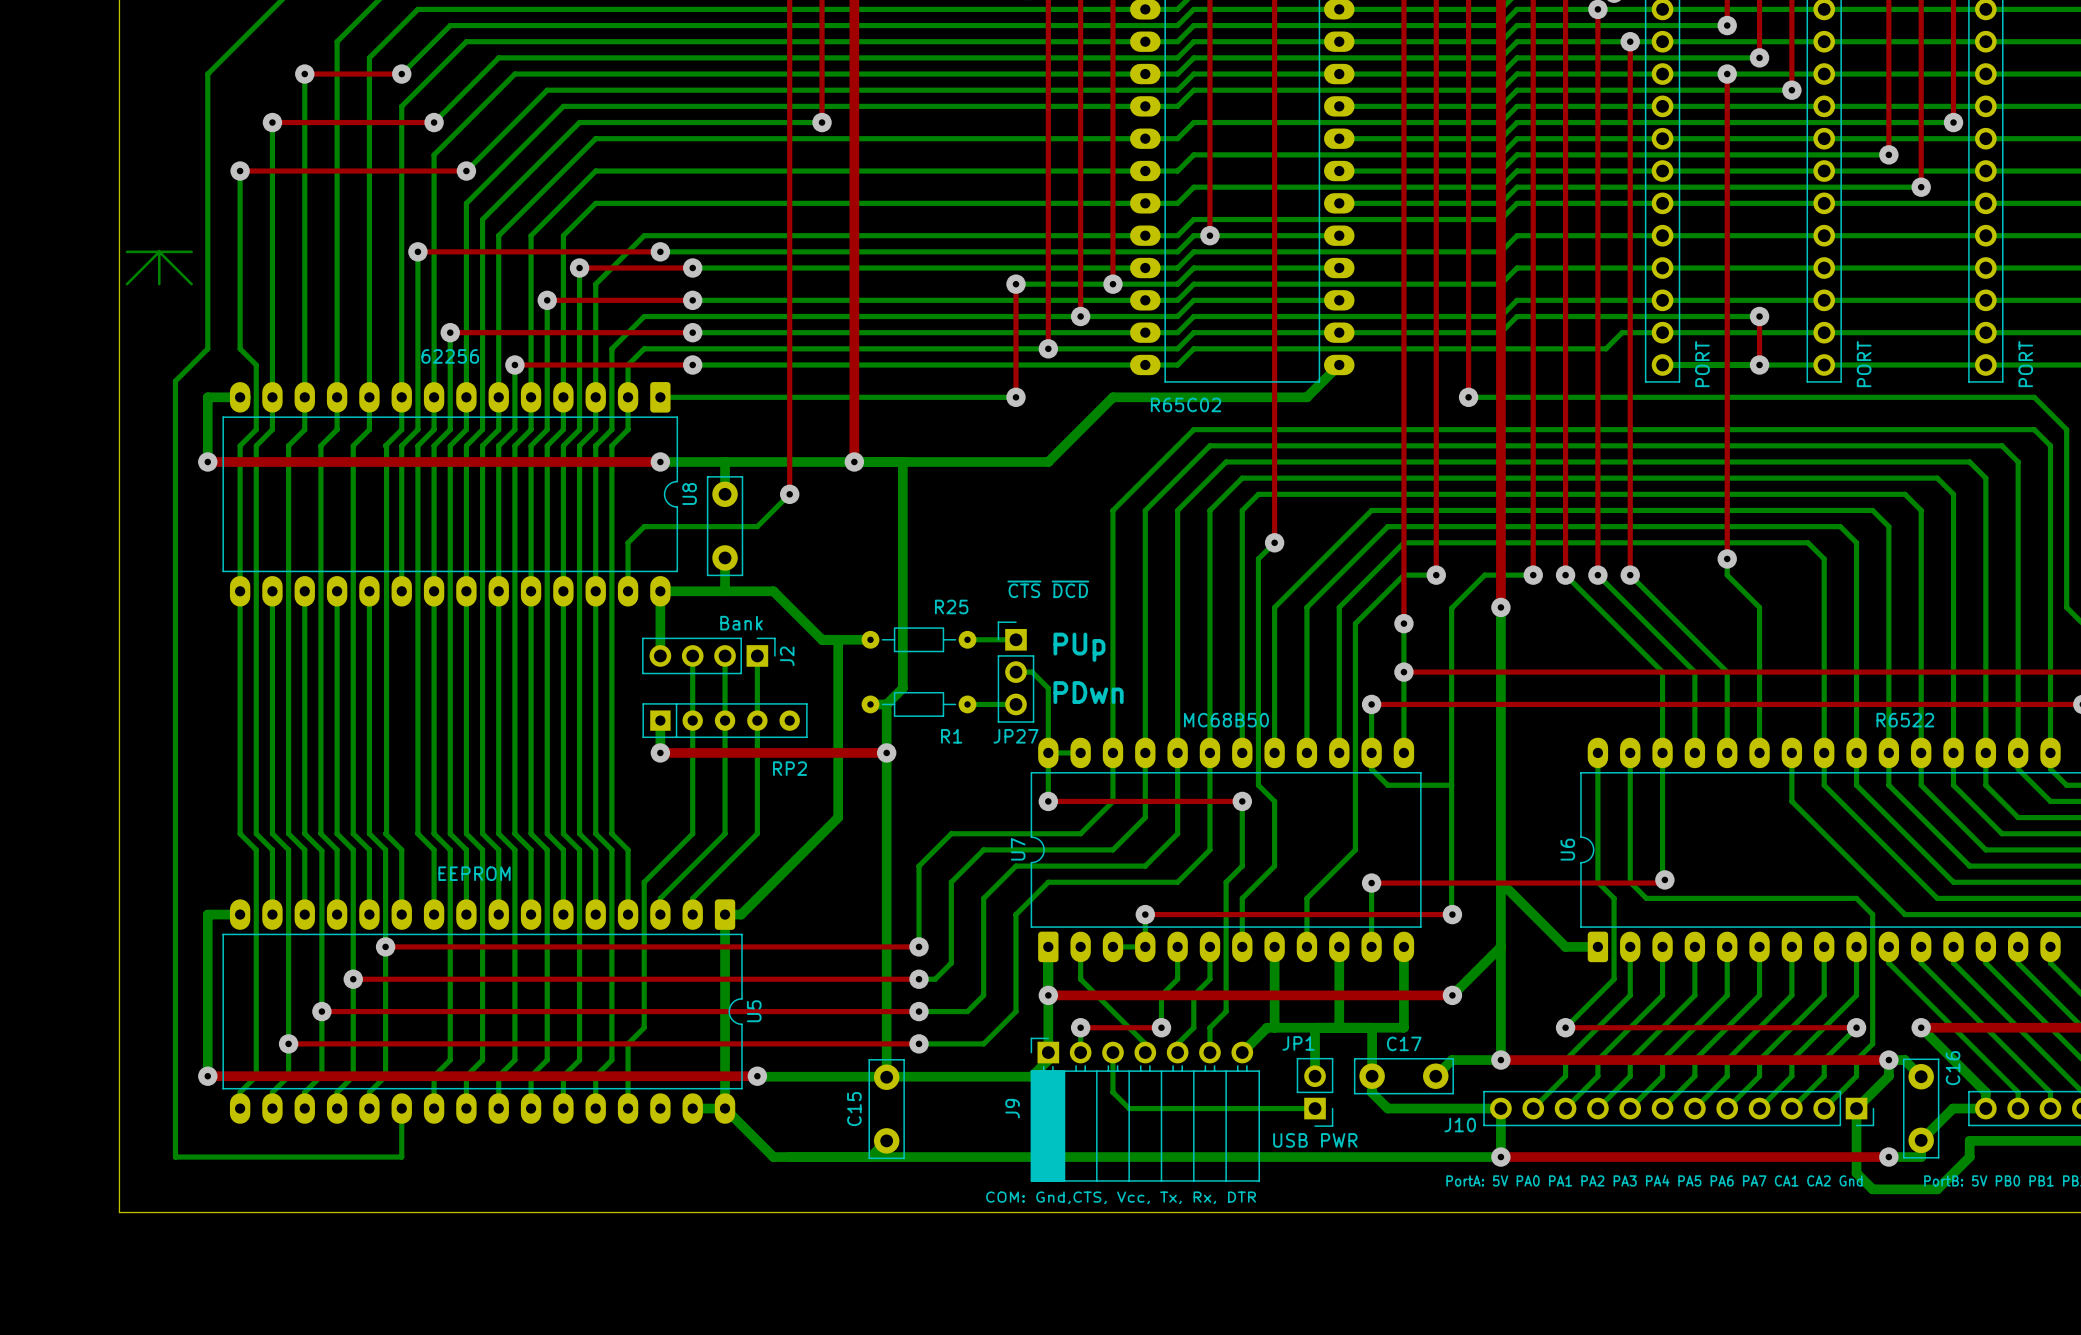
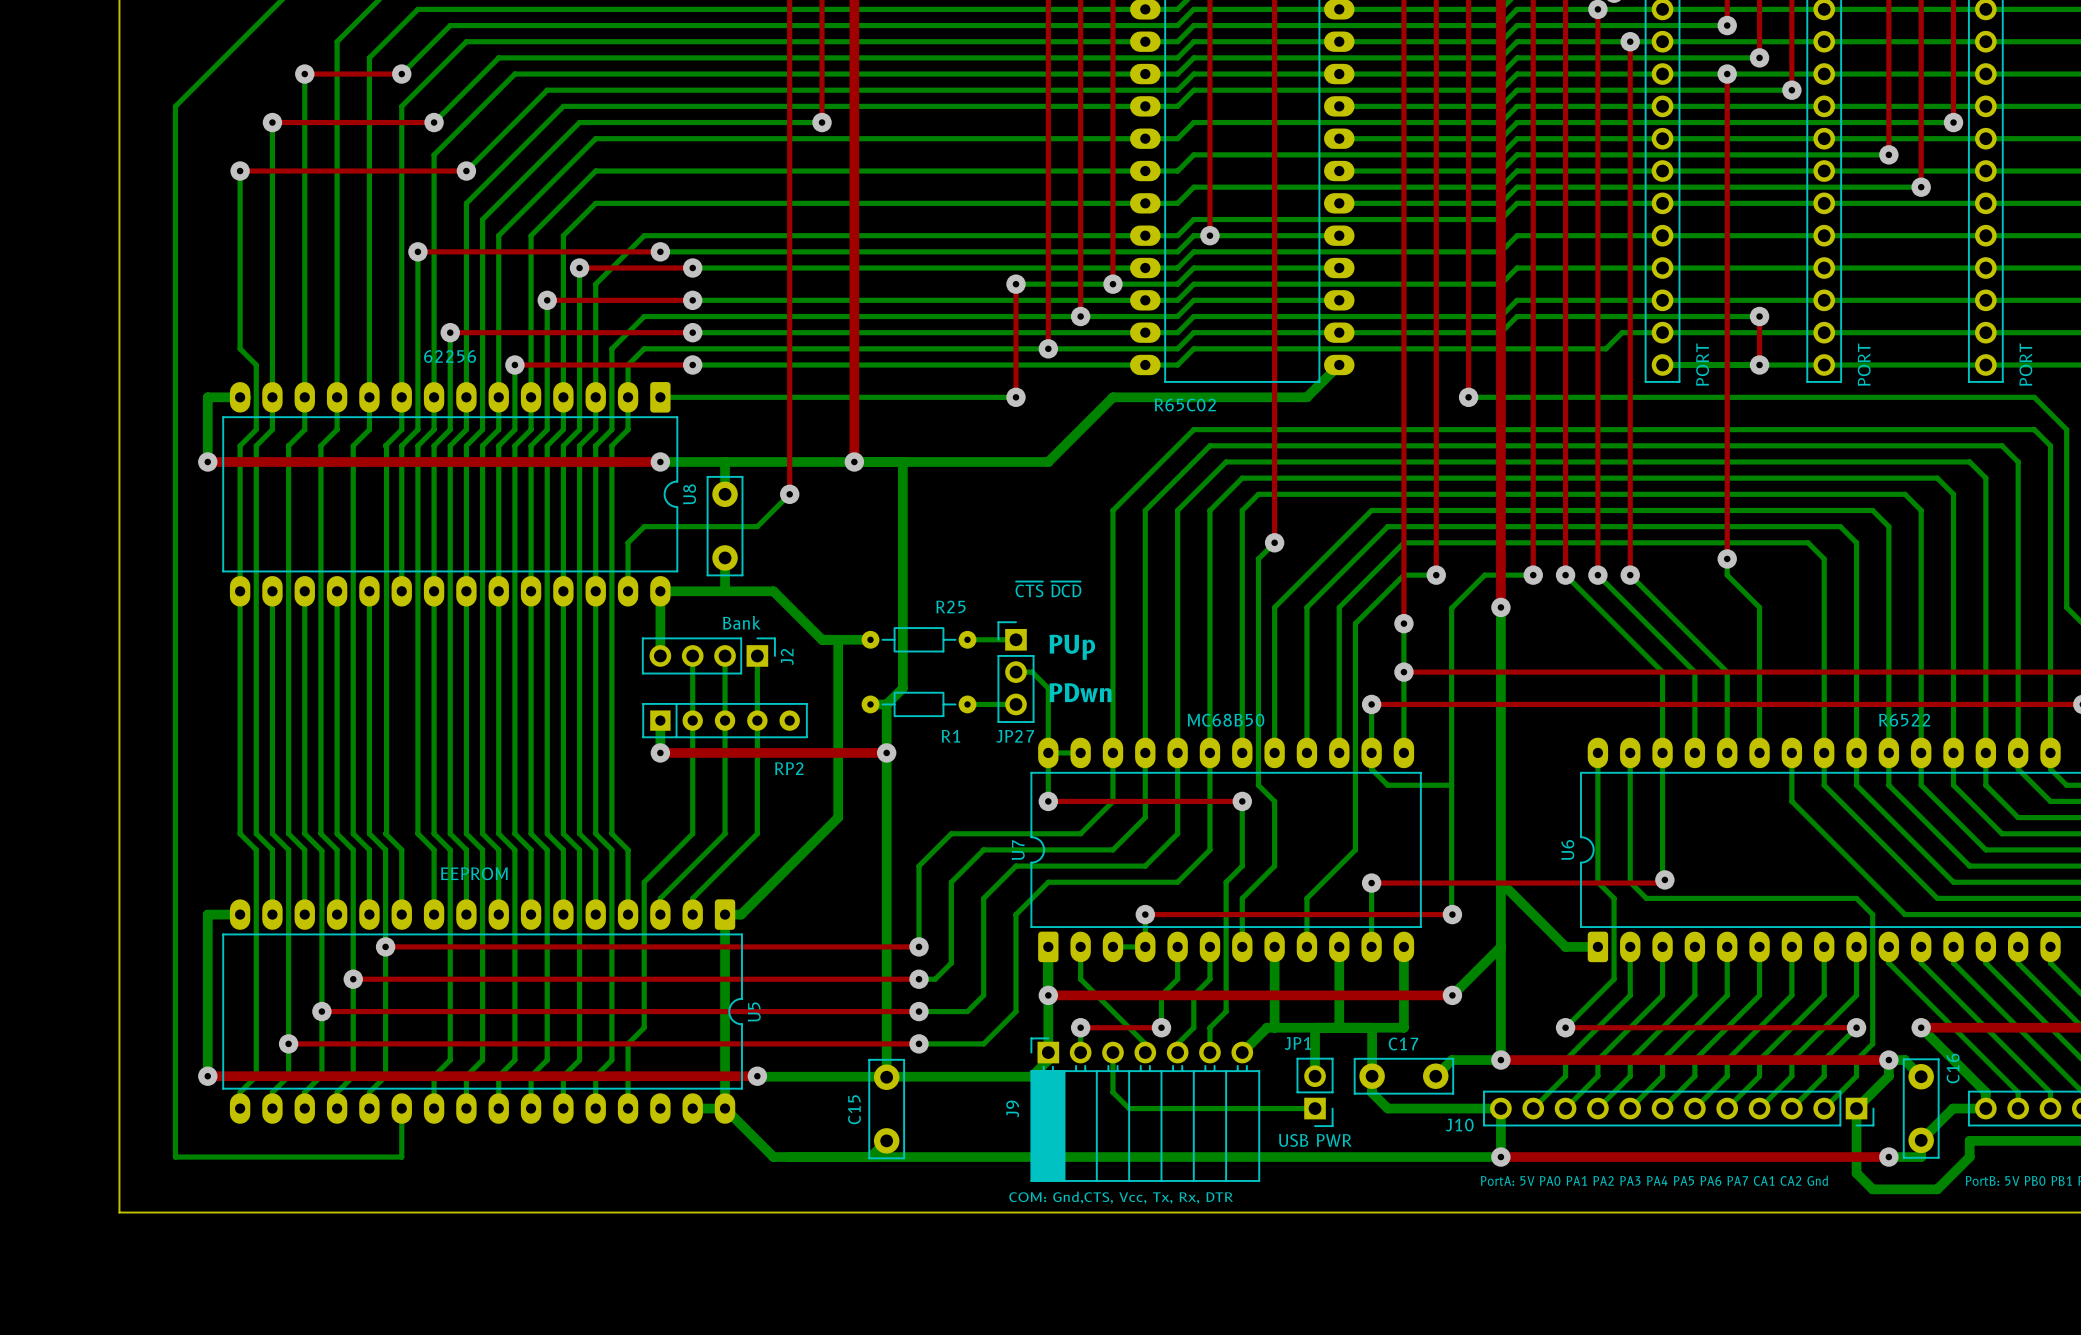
bottom track: (207, 74) (207, 348) (175, 381) -> (207, 74) (175, 106) (175, 381)
bottom track: (126, 251) (191, 251) -> none
bottom track: (159, 251) (191, 284) -> none
bottom track: (159, 251) (126, 284) -> none
bottom track: (159, 251) (159, 284) -> none

